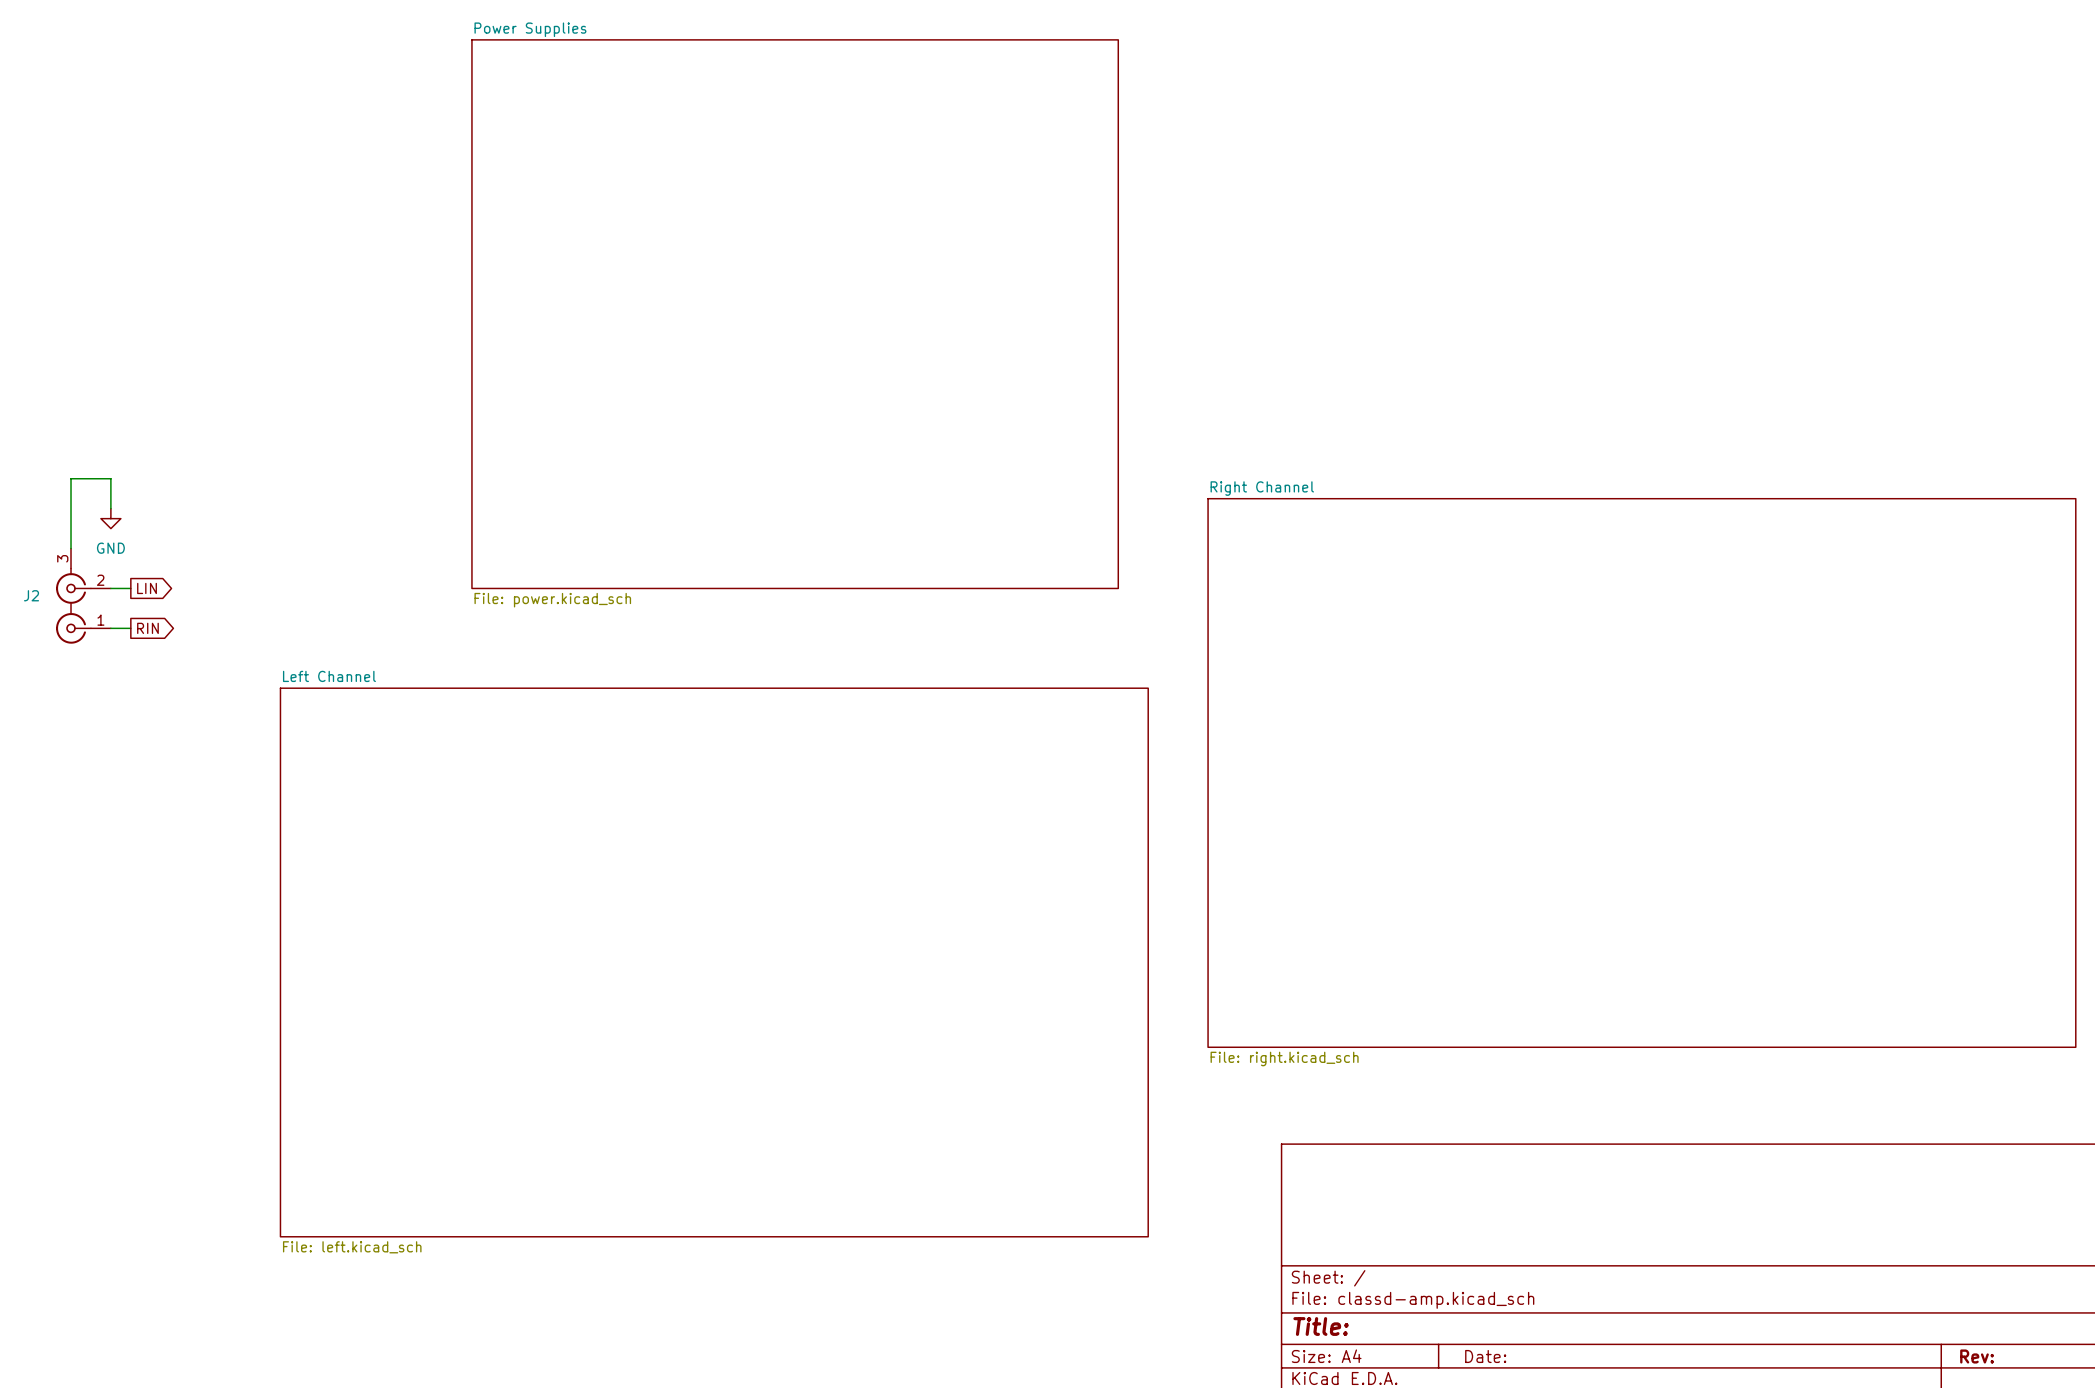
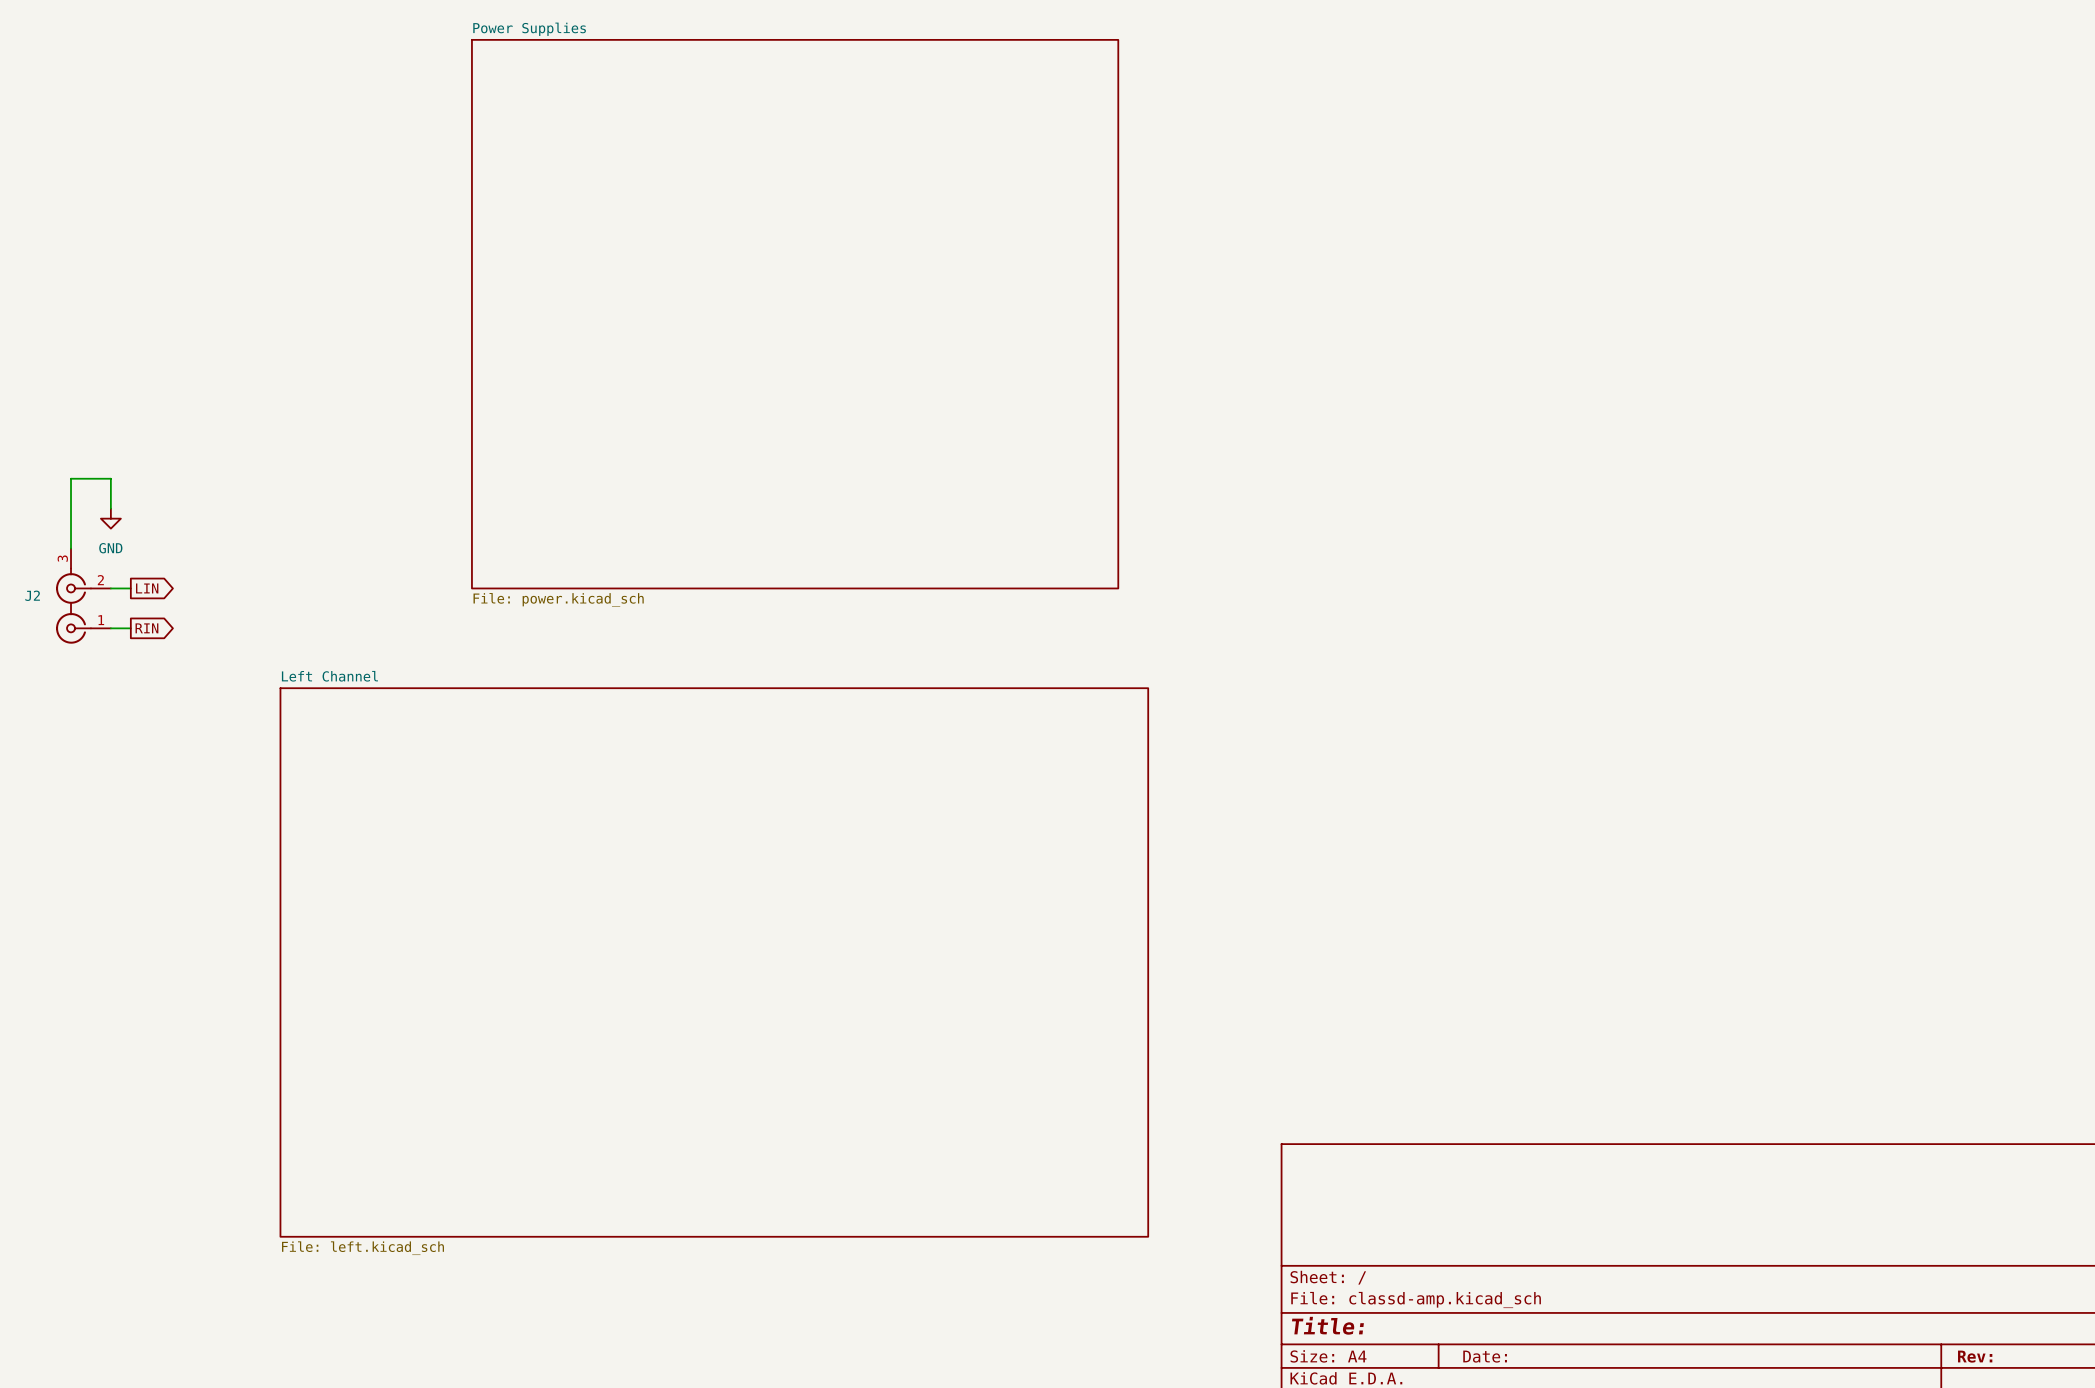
sheet Right Channel: File: right.kicad_sch (1641, 772) -> none

